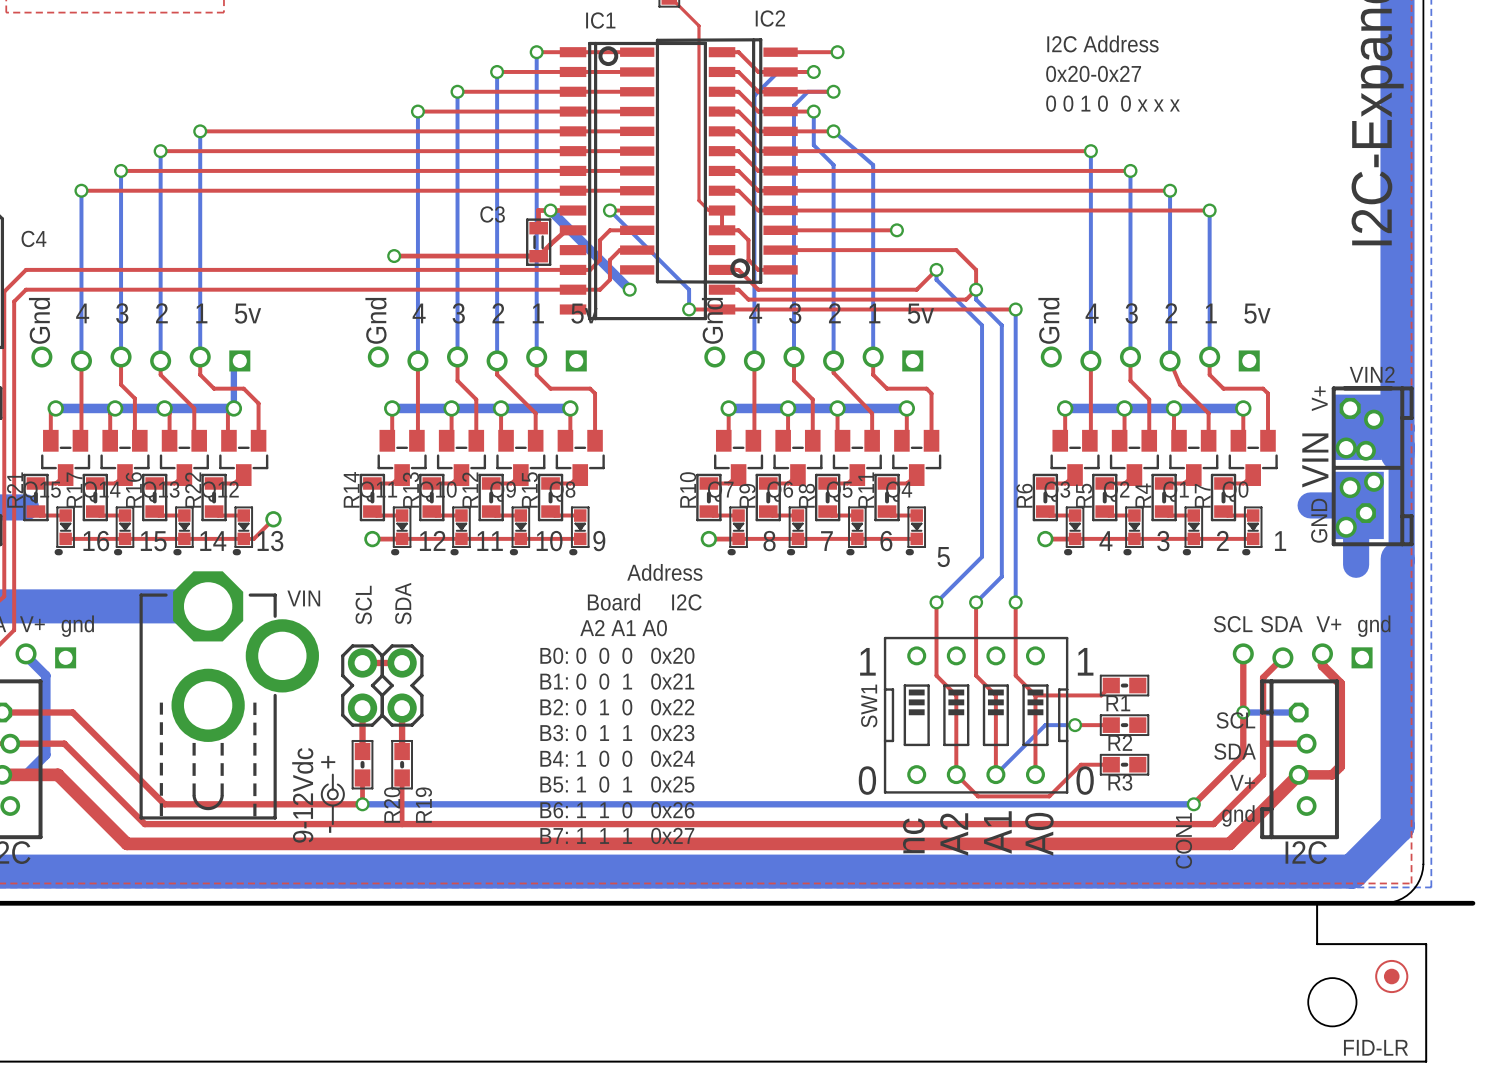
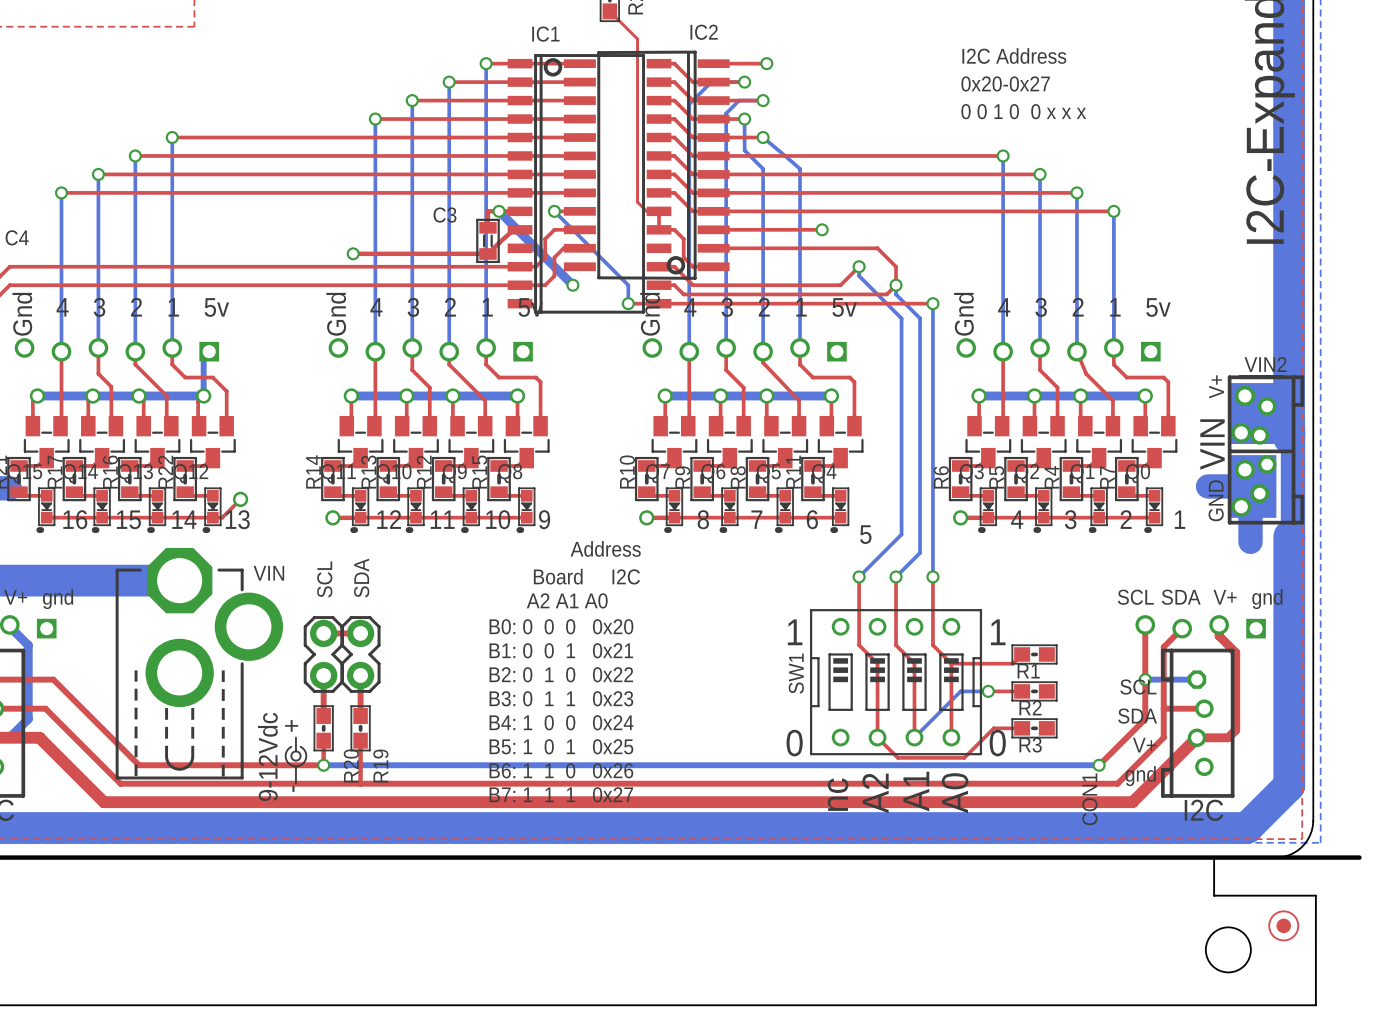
FID-LR name: FID-LR (1376, 1047) -> none

